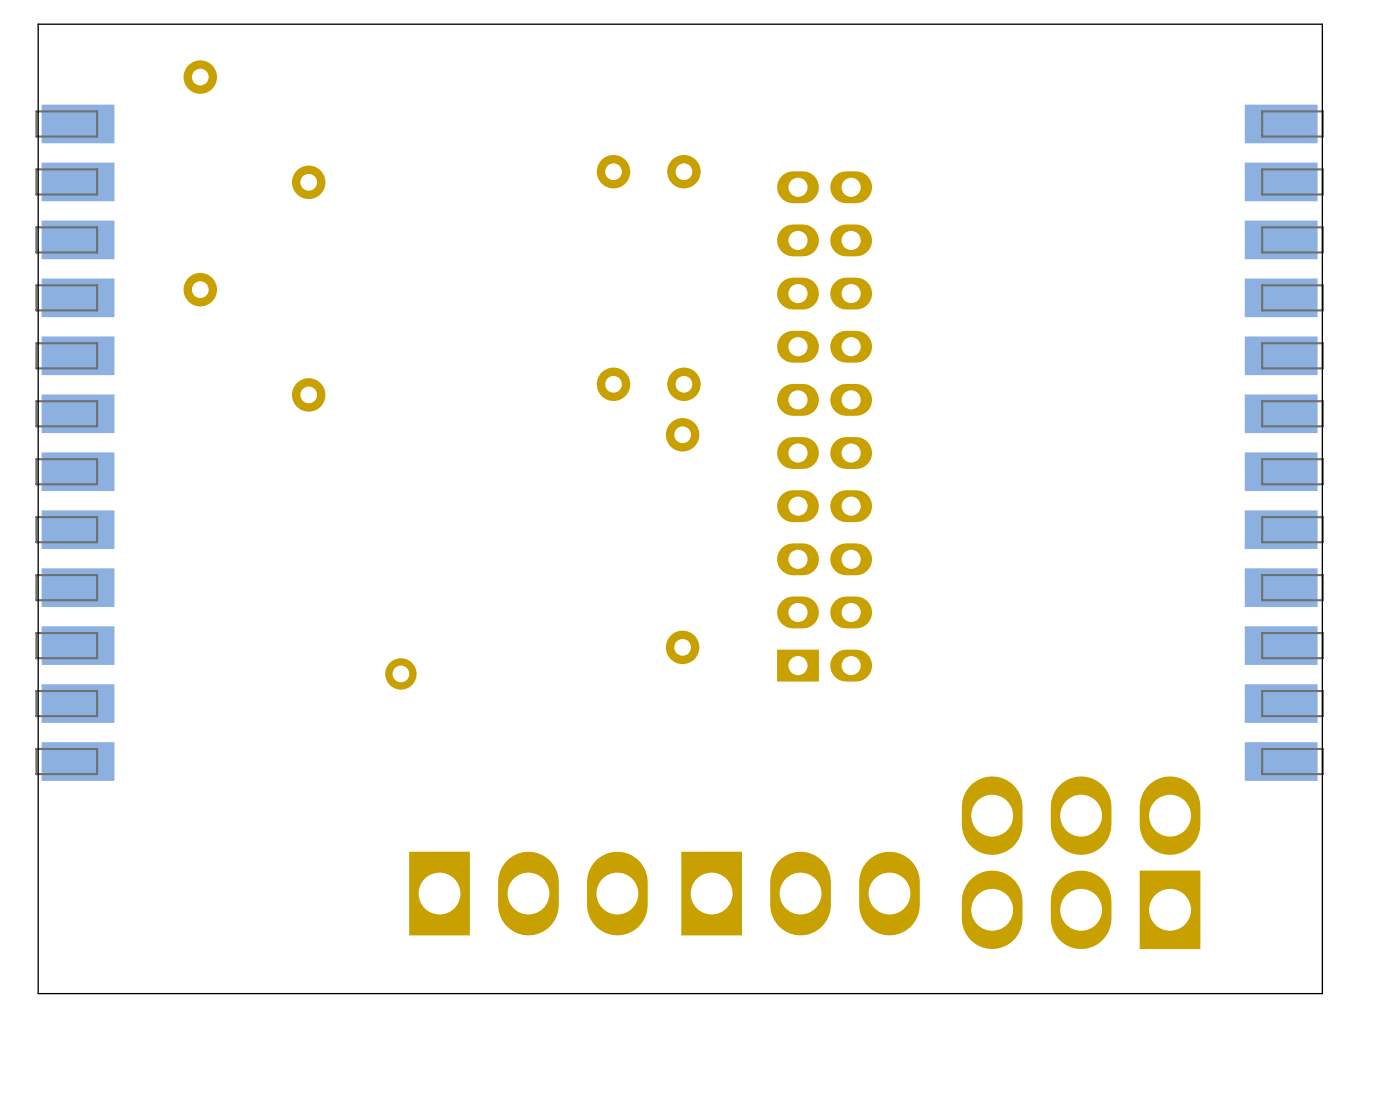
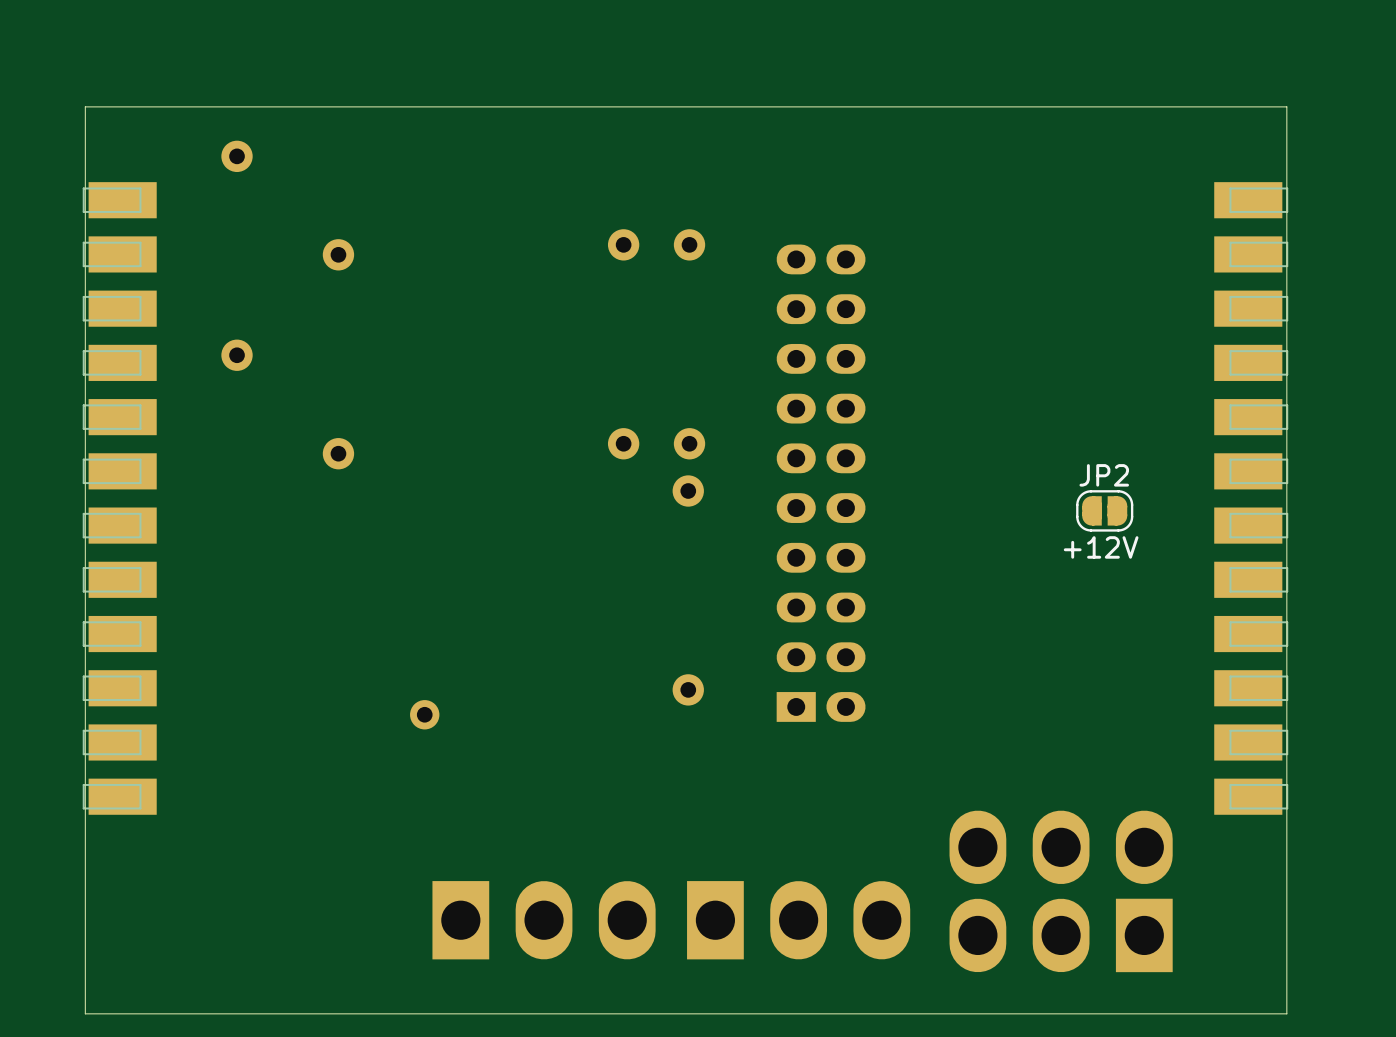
JP2: none -> +12V (1104, 510)

